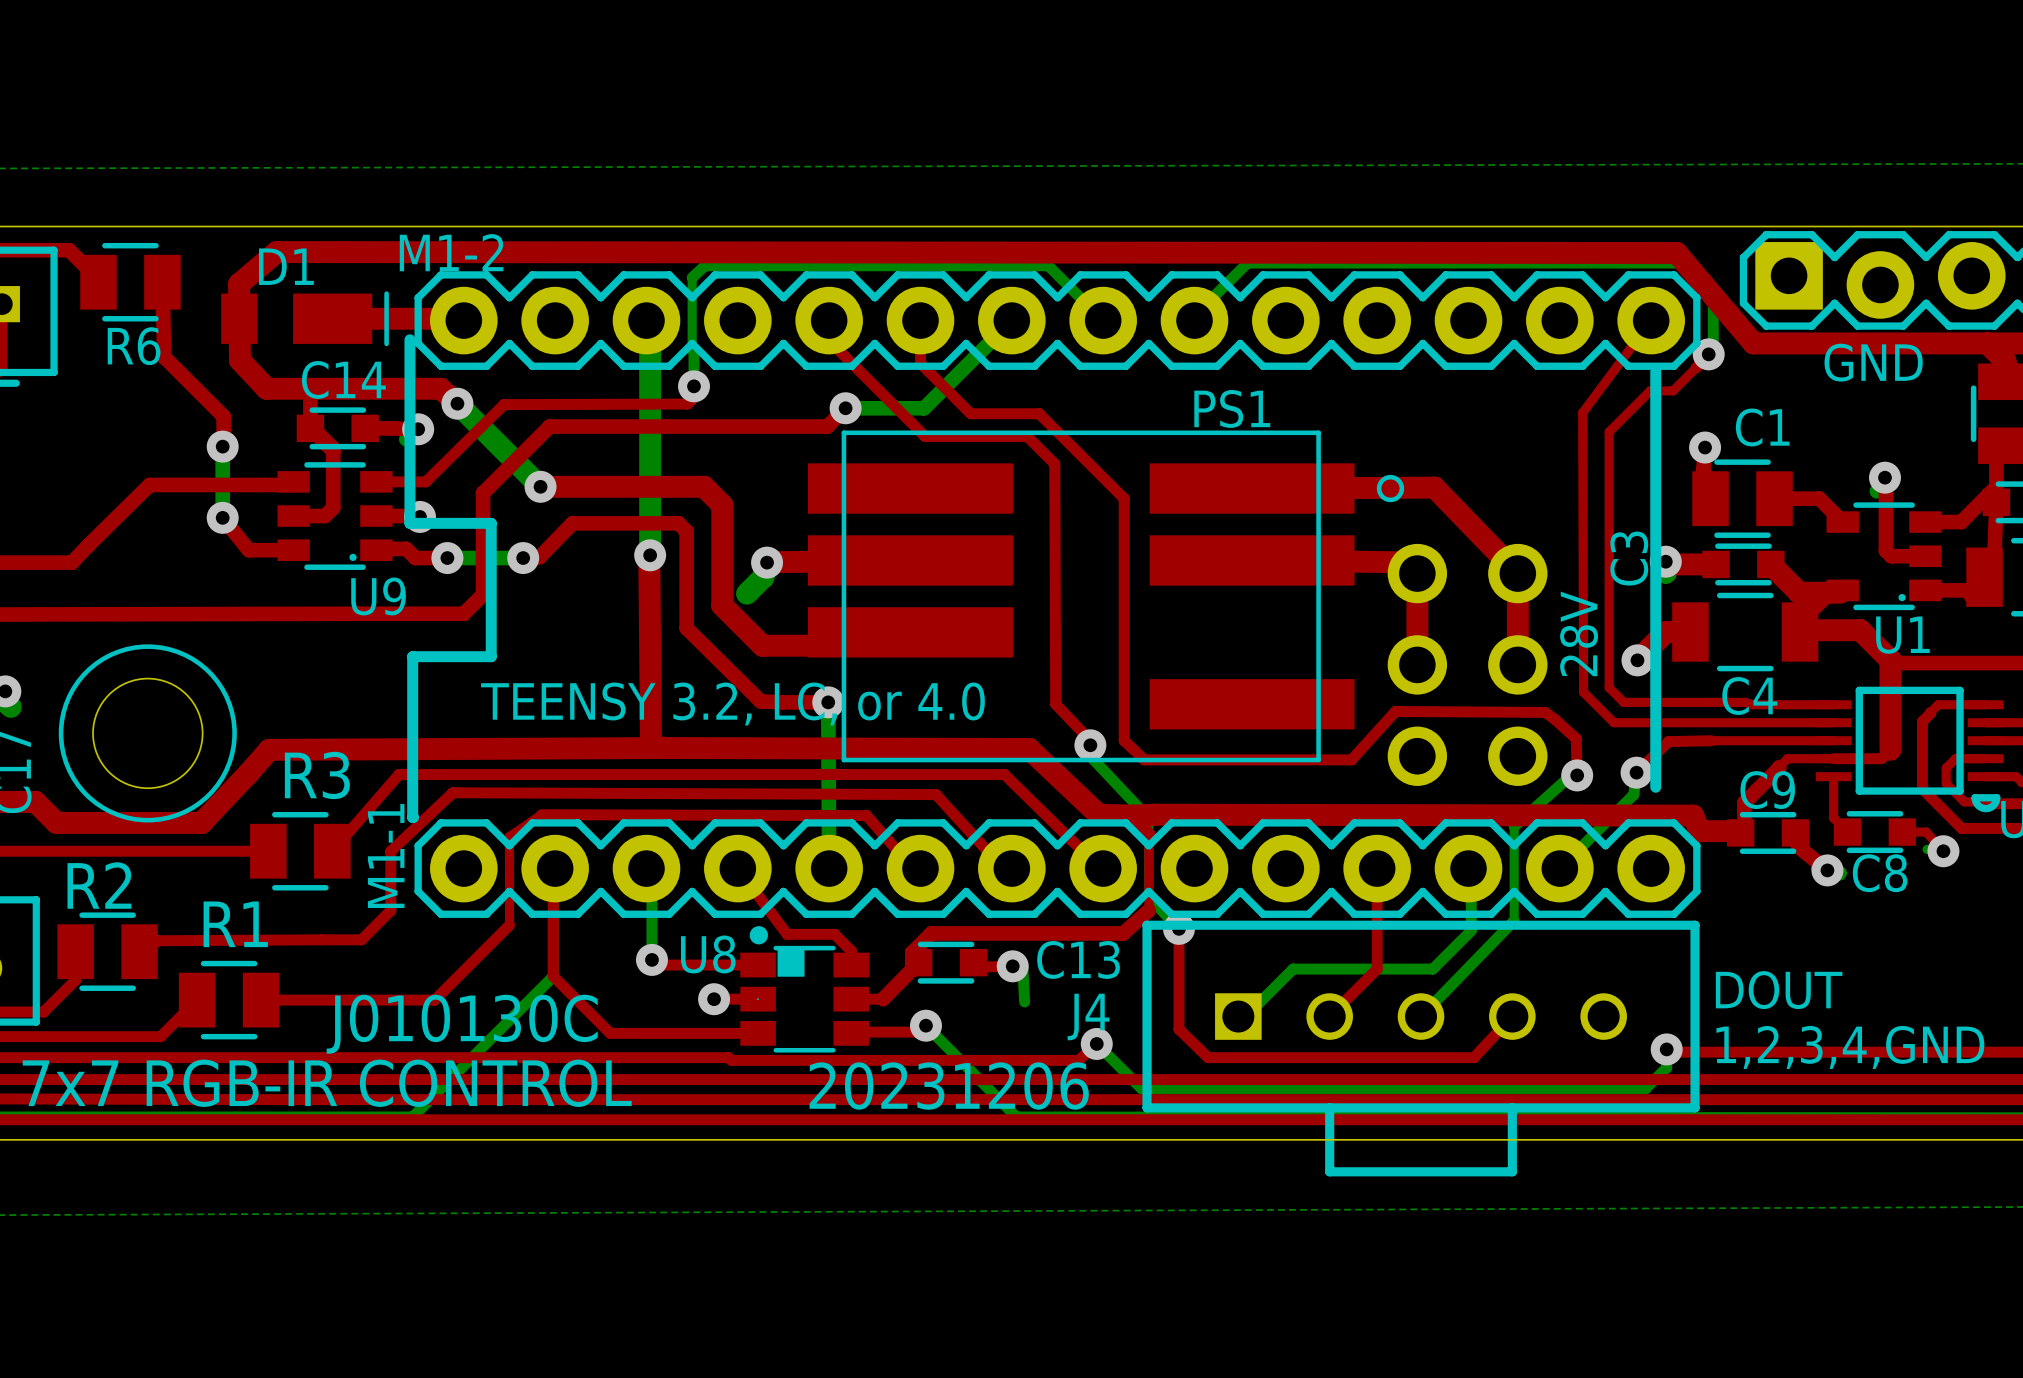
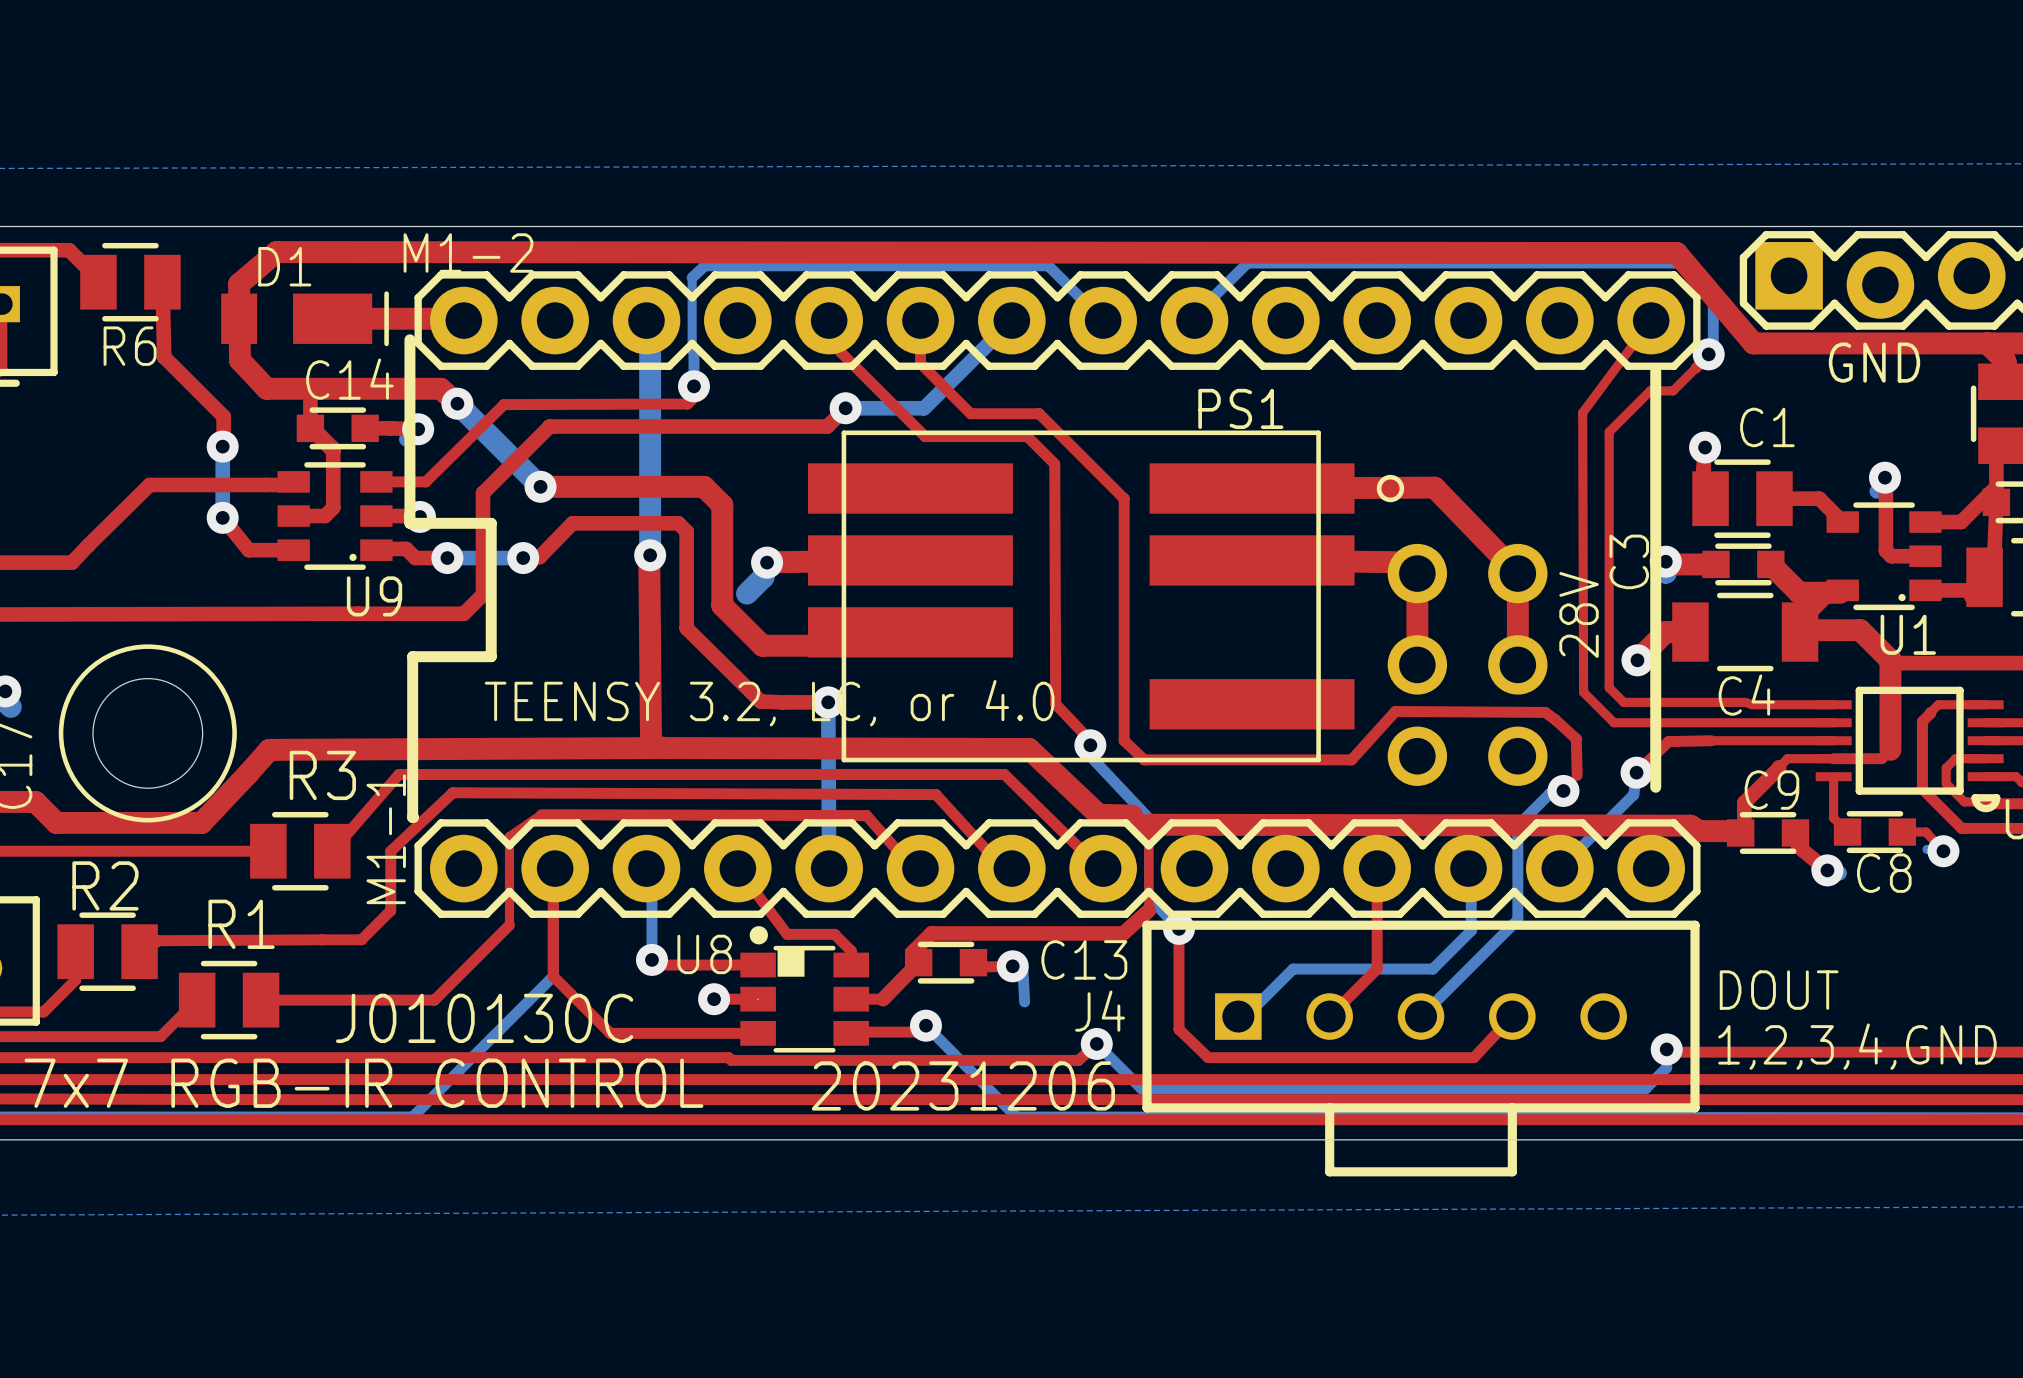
text position: 28V (1579, 633) -> 28V (1579, 614)
bottom track: (1577, 775) (1568, 777) (1514, 826) (1514, 920) (1421, 1016) -> (1563, 790) (1549, 793) (1517, 825) (1517, 919) (1421, 1016)
via position: (1577, 775) -> (1563, 790)
top track: (1132, 815) (1693, 815) (1699, 831) -> (1143, 825) (1690, 825) (1699, 831)

